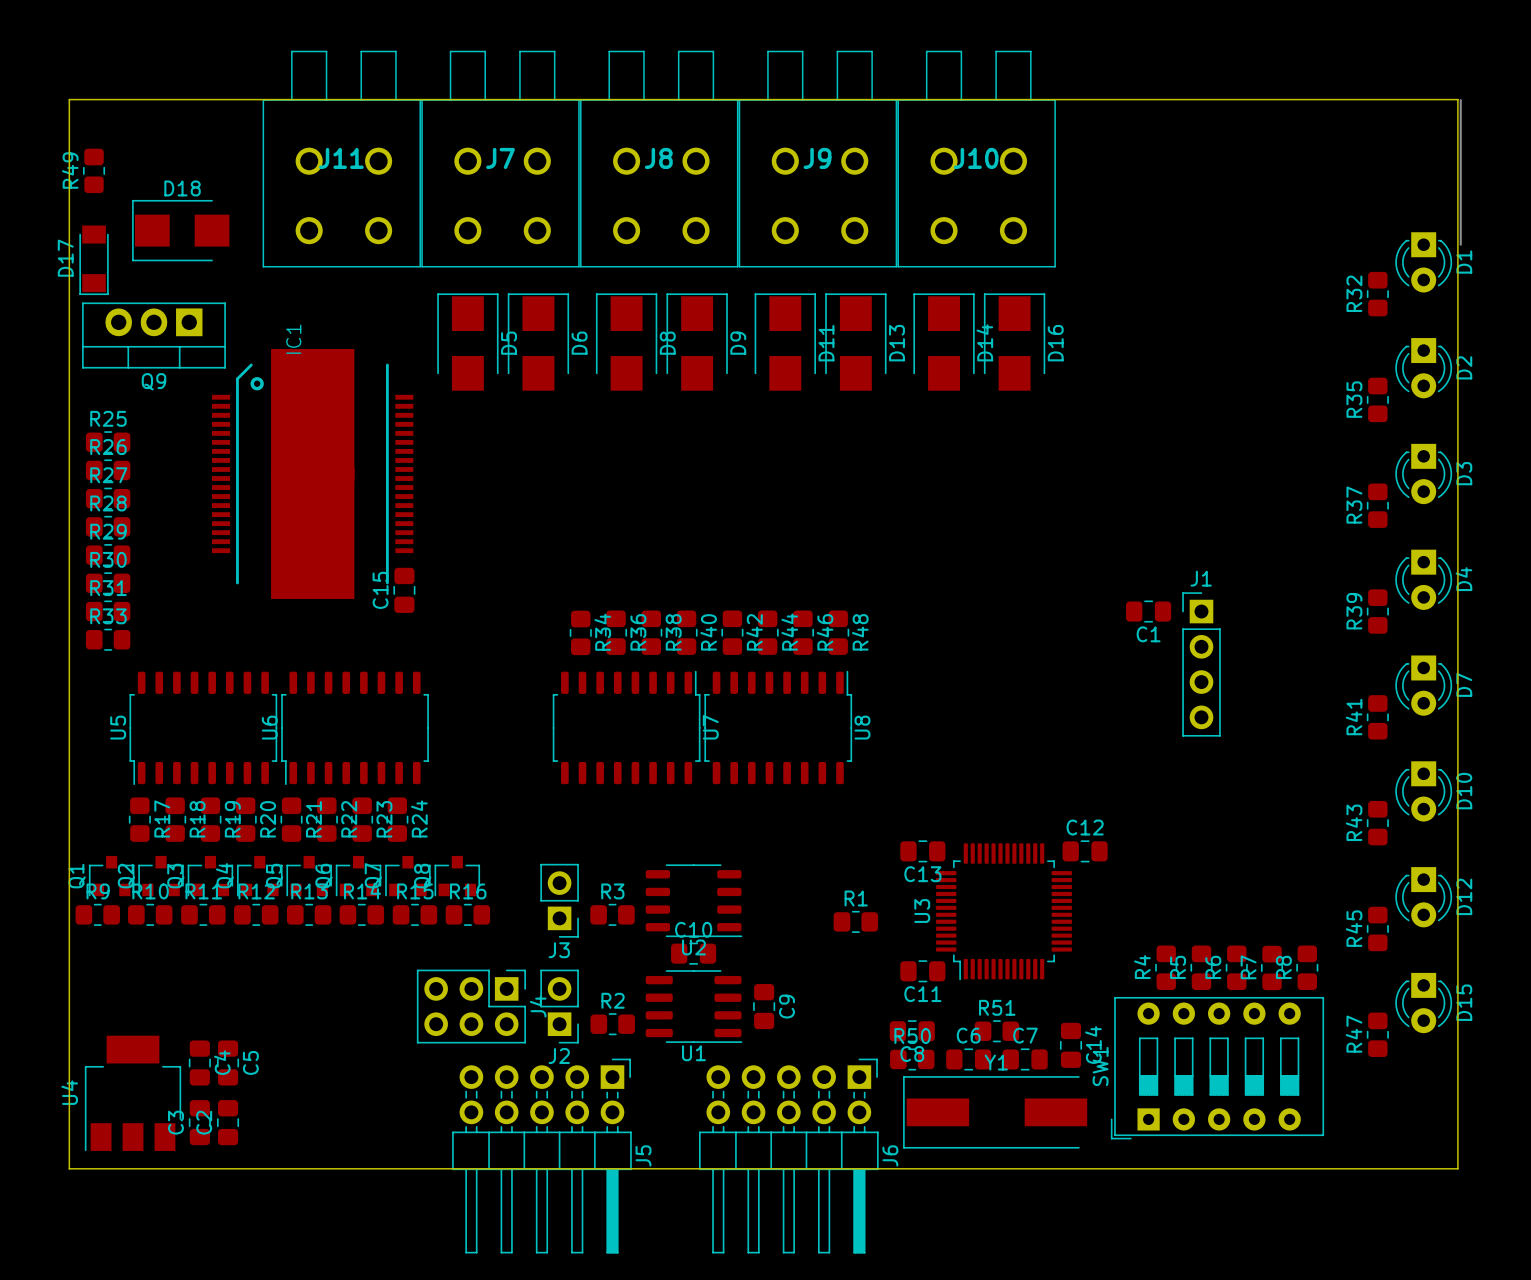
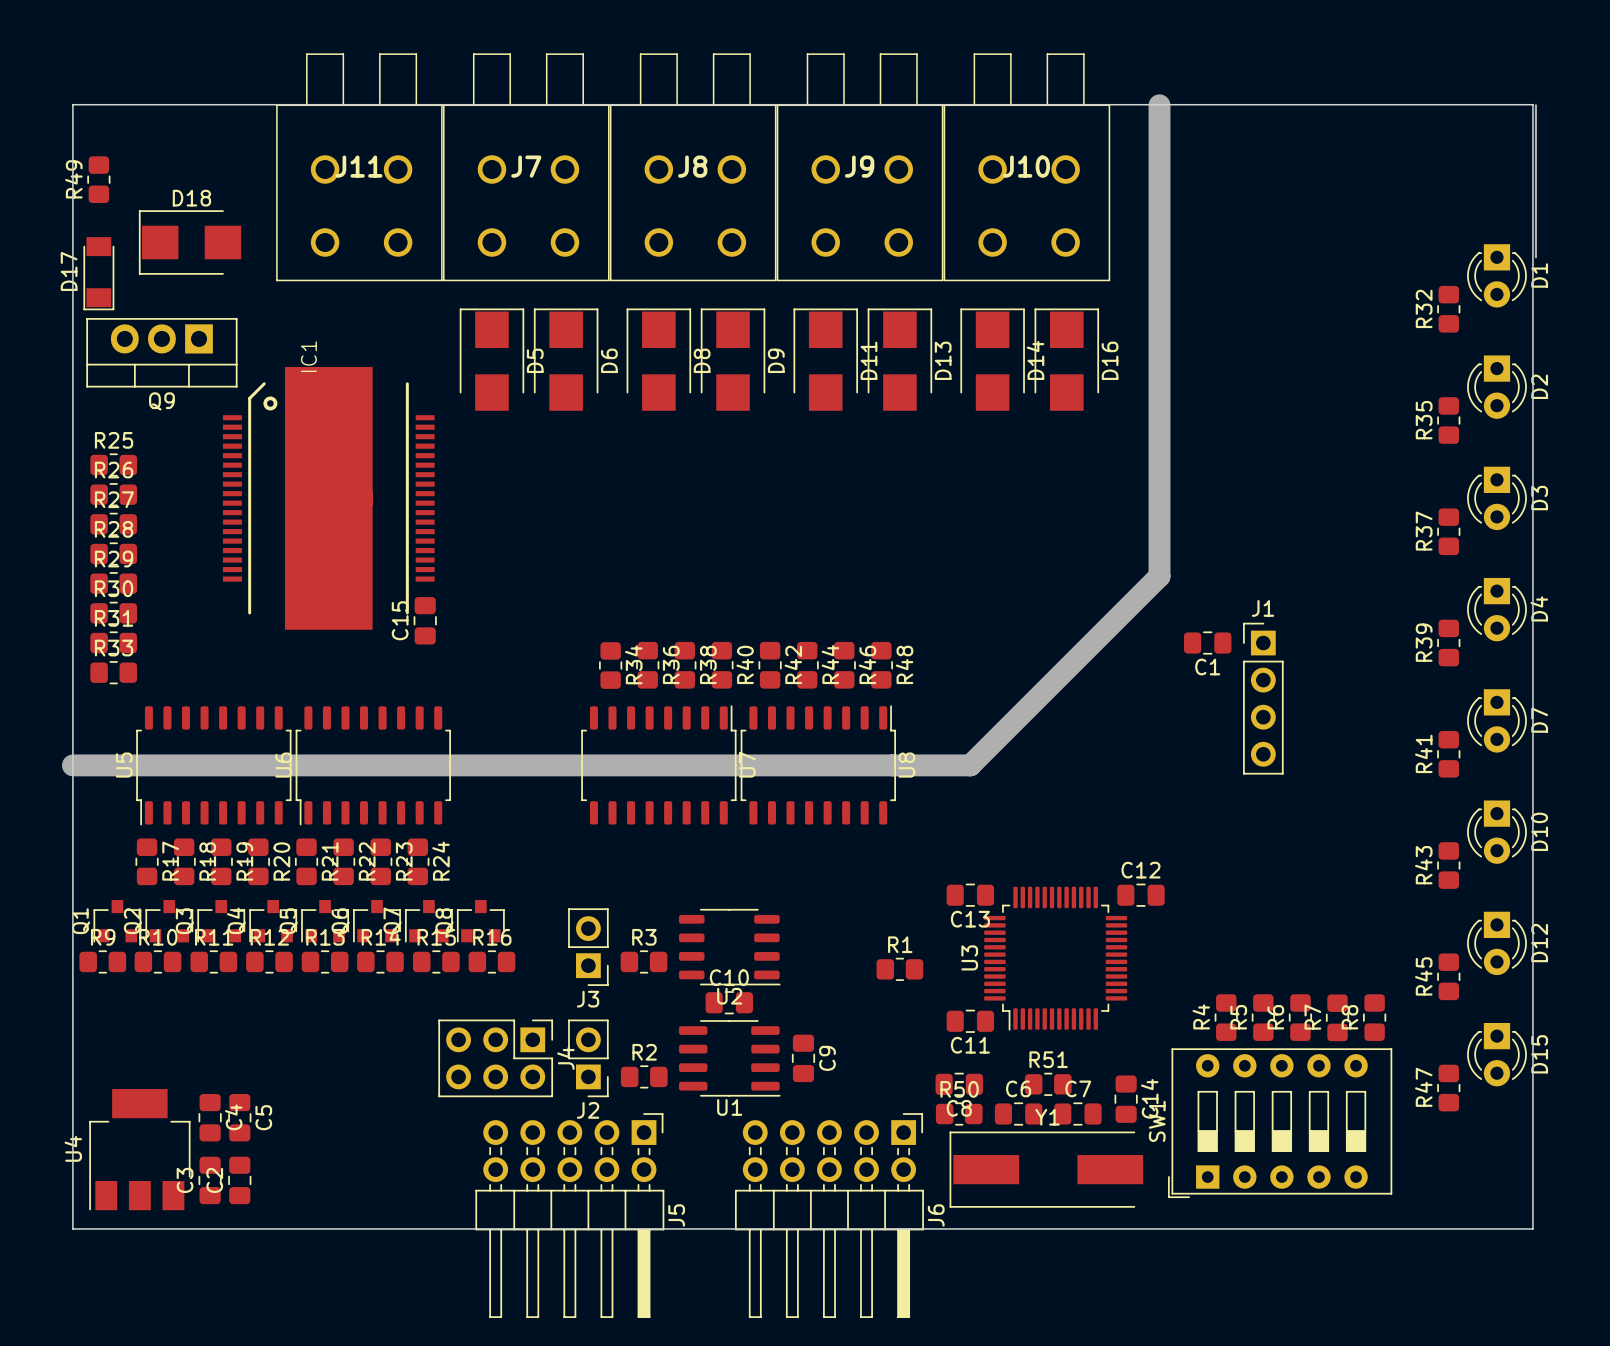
line: none -> (1159, 105) (1159, 576) (970, 765) (72, 765)

